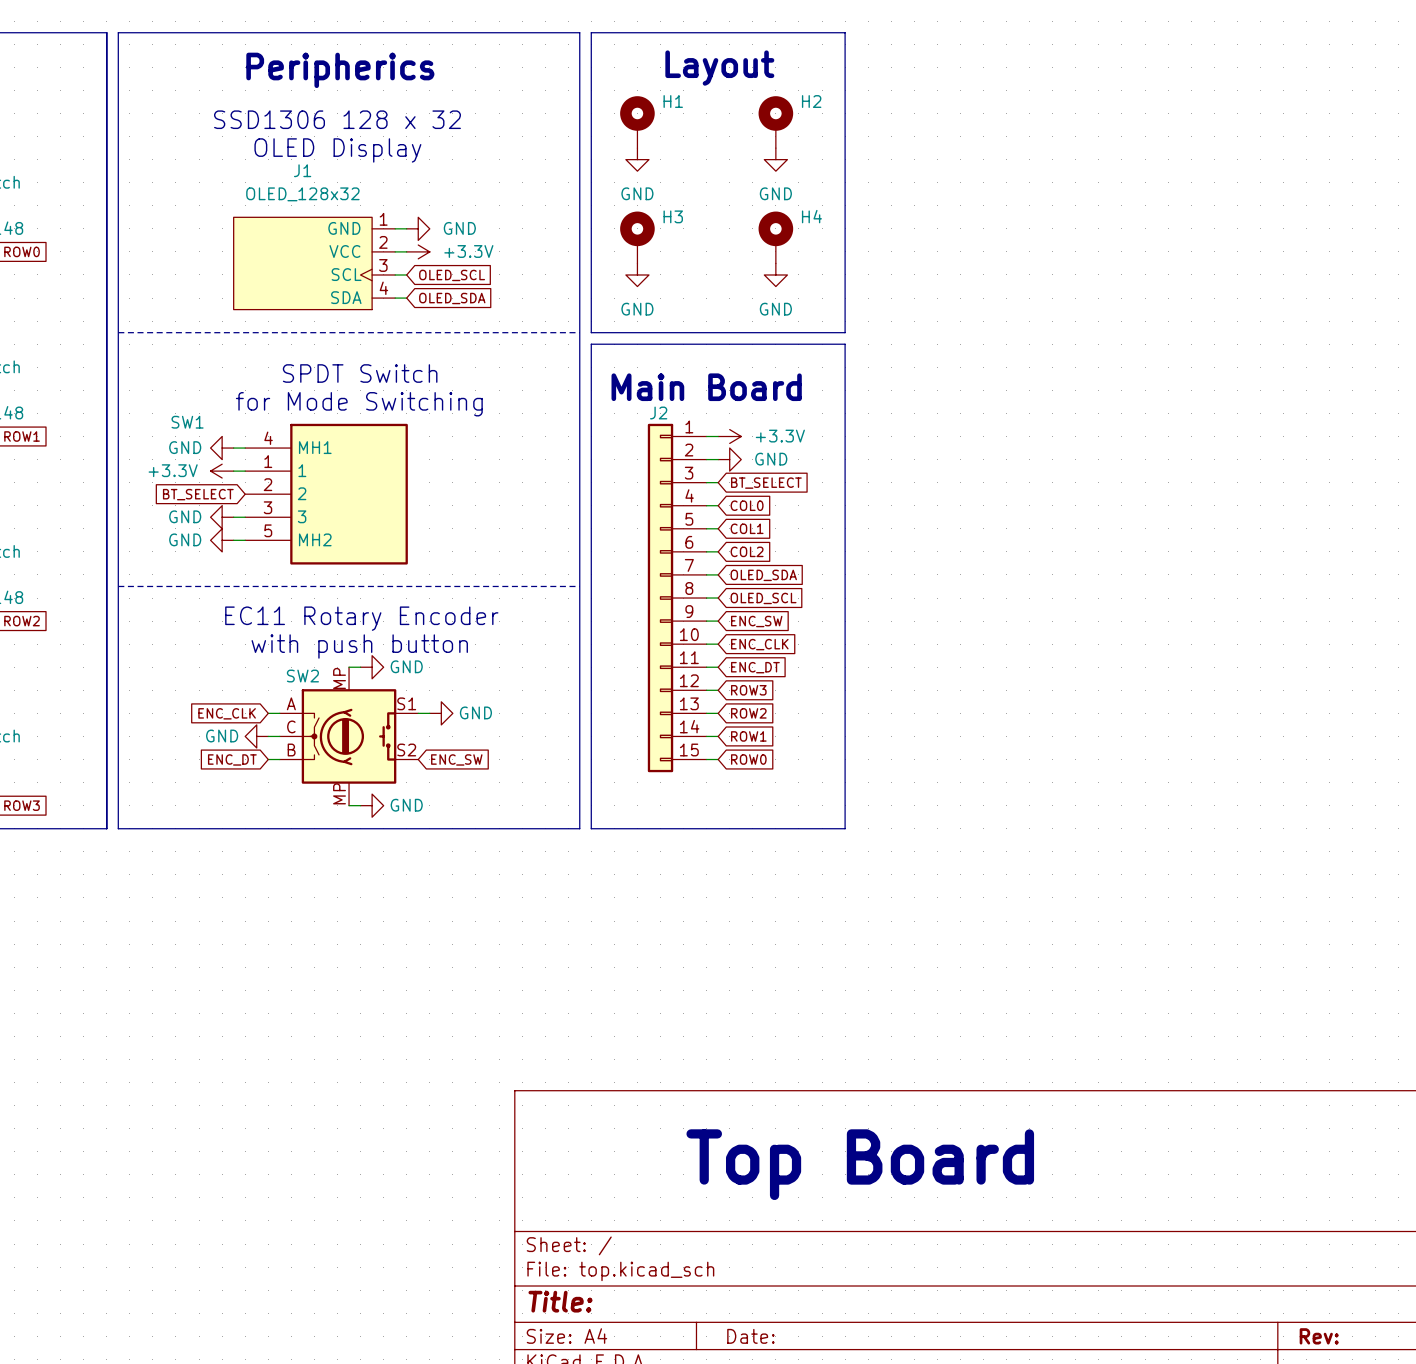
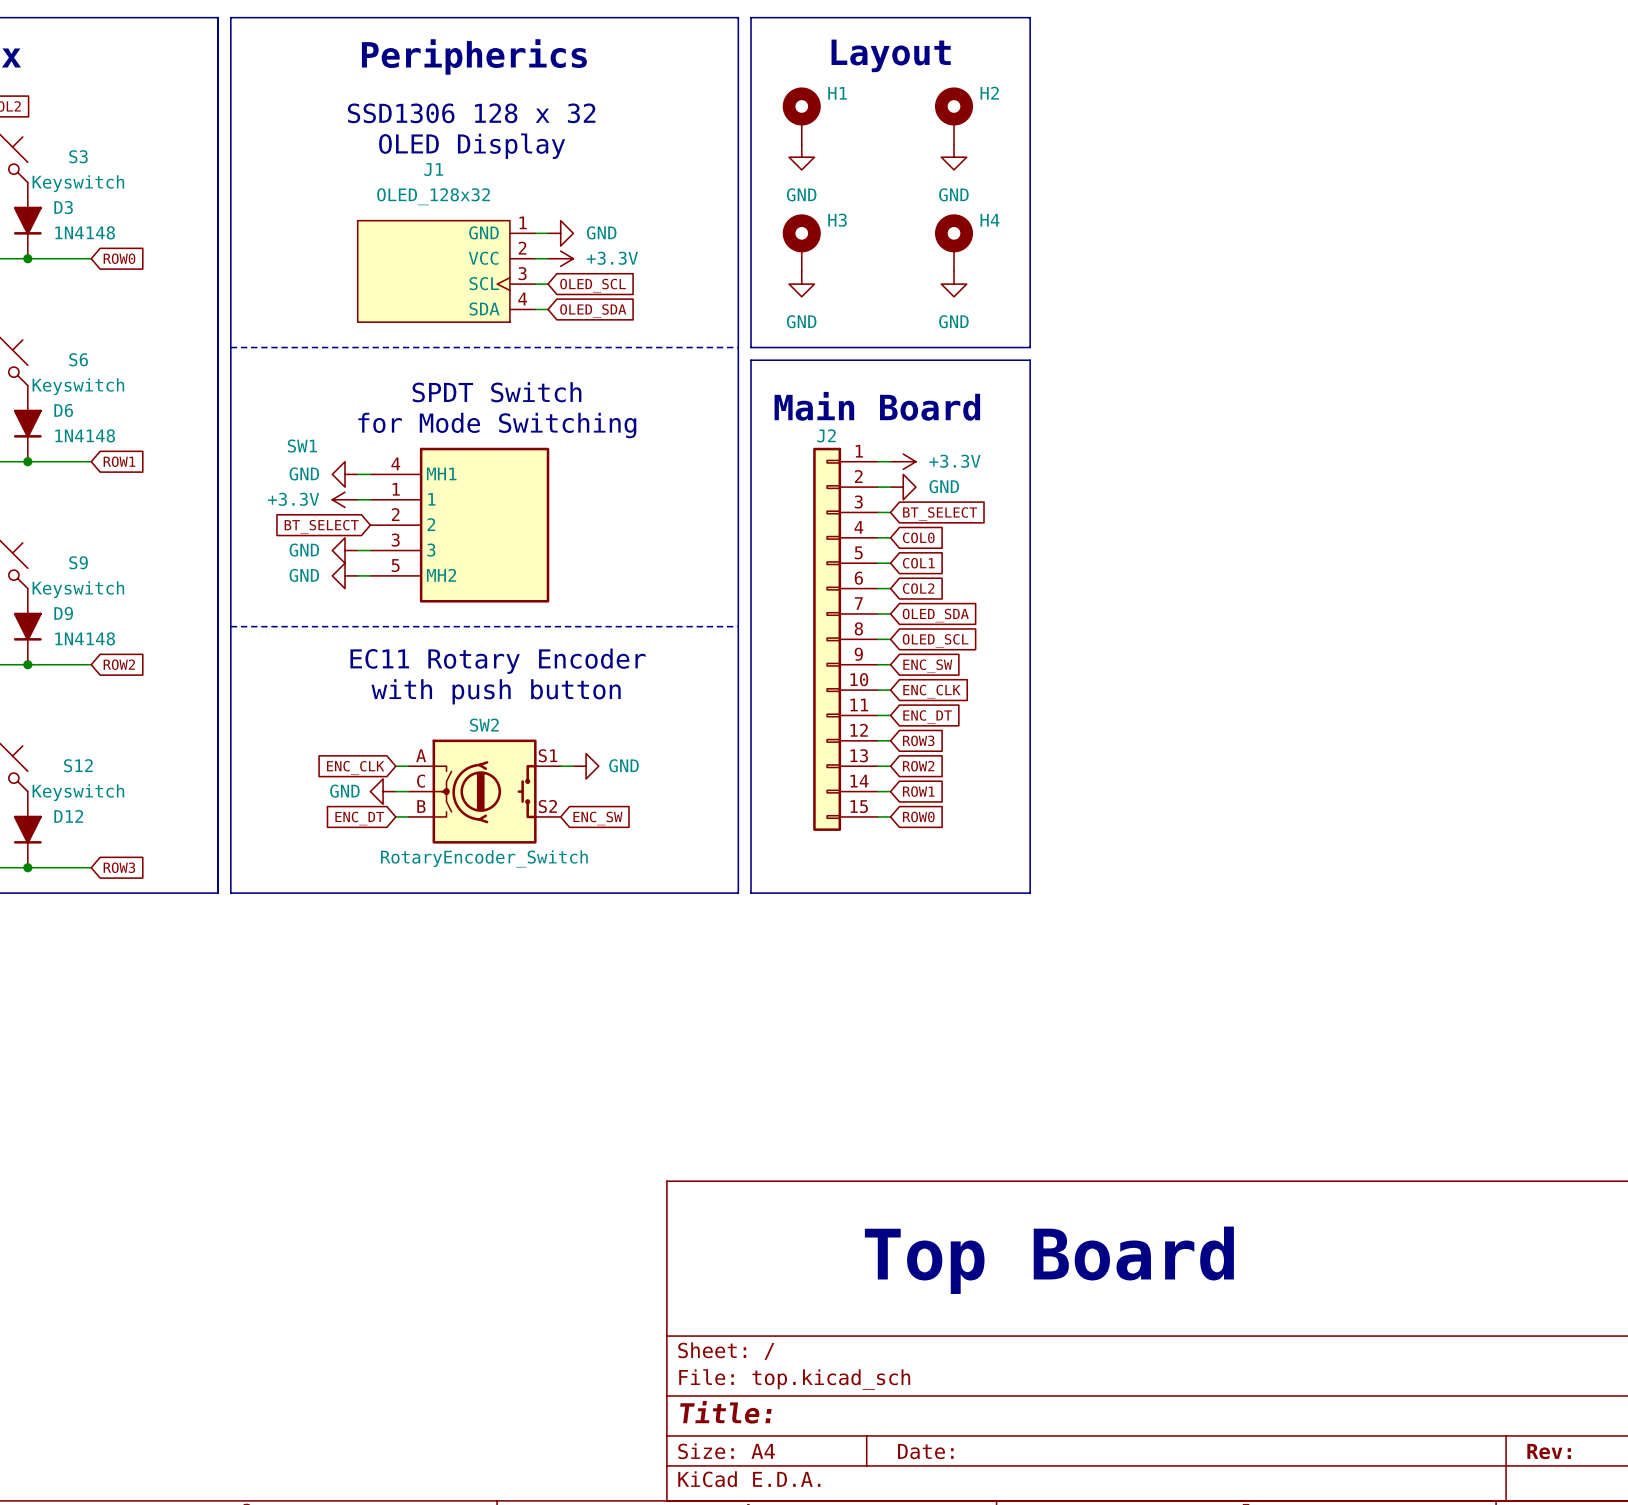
SW2 symbol: [279, 667, 419, 806] -> [408, 739, 561, 844]
wire: (349, 667) (360, 667) -> none
power symbol: GND (372, 667) -> none
SW2 name position: SW2 (302, 676) -> SW2 (484, 725)
SW2 value: none -> RotaryEncoder_Switch (484, 858)
wire: (349, 805) (360, 805) -> none
power symbol: GND (372, 805) -> none

